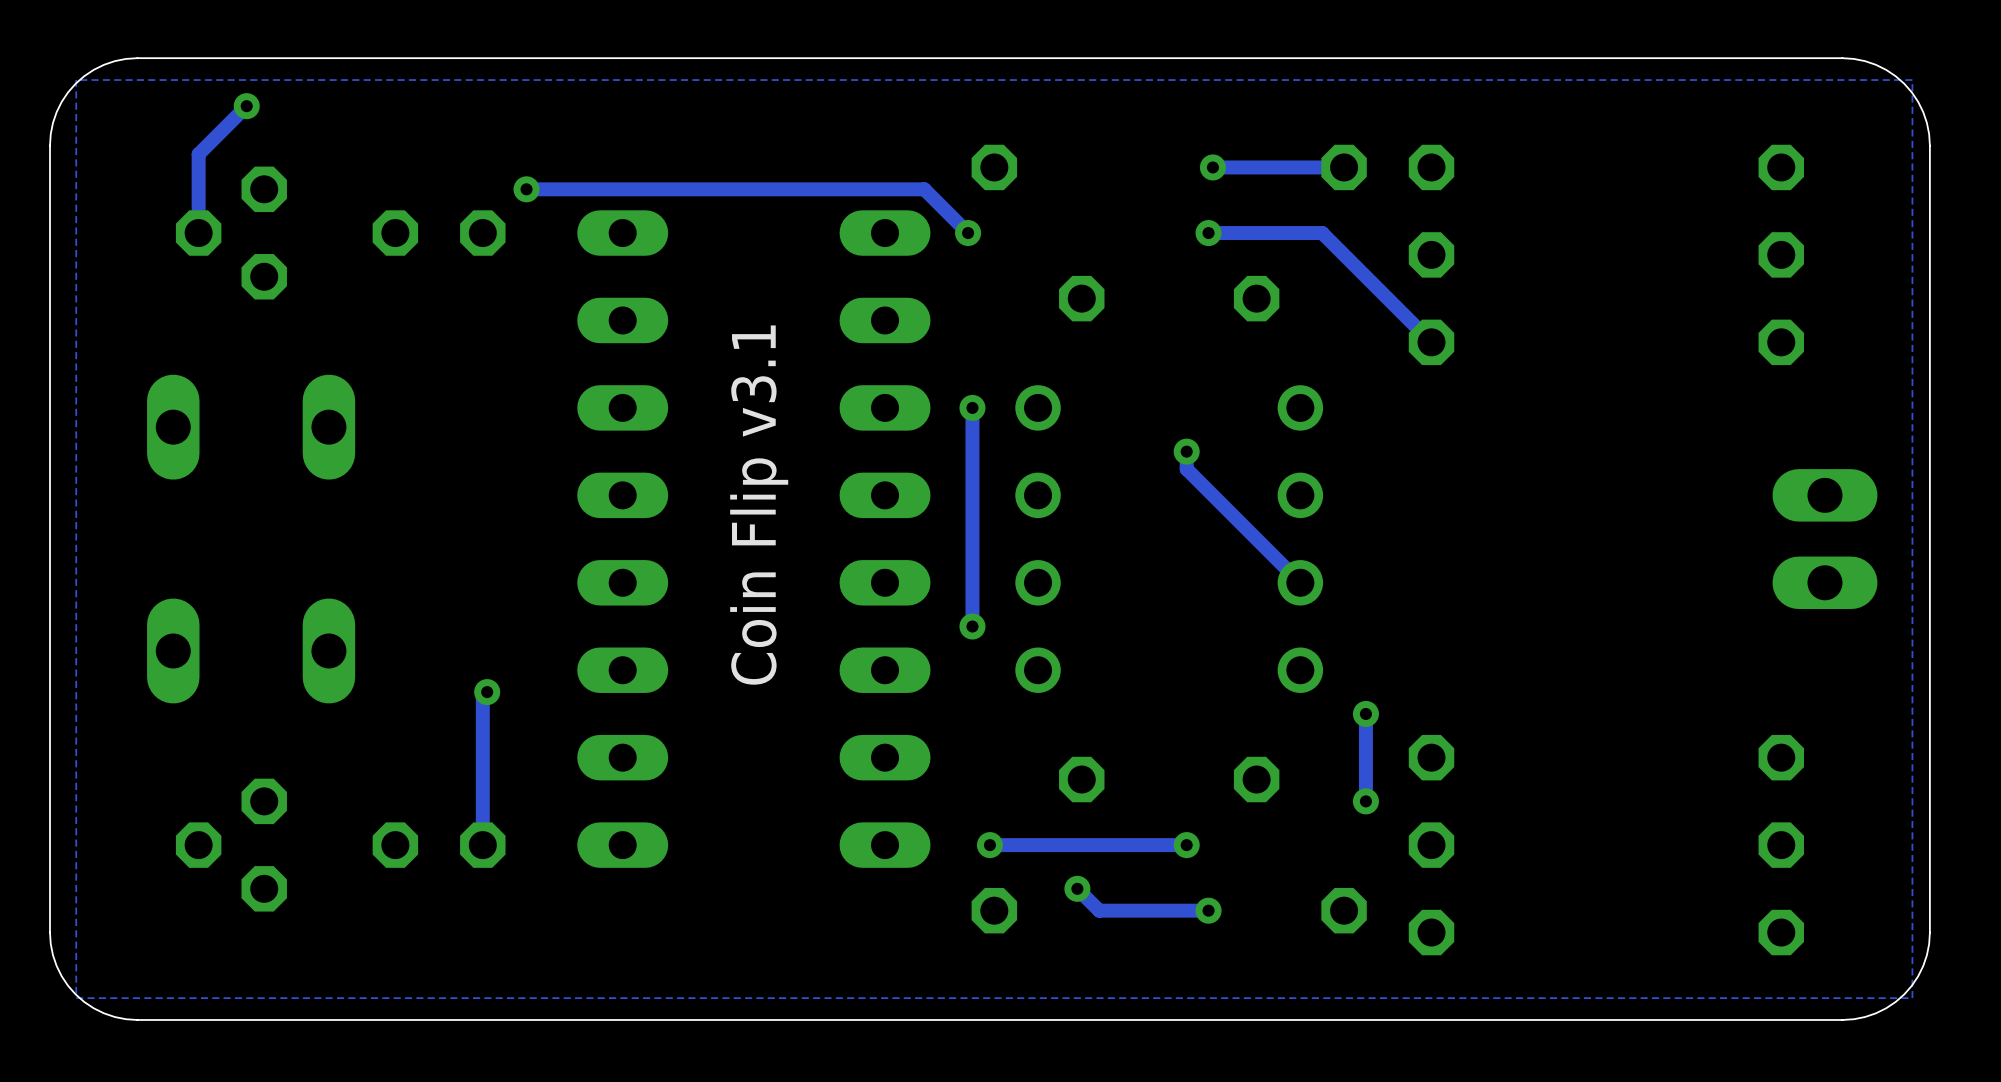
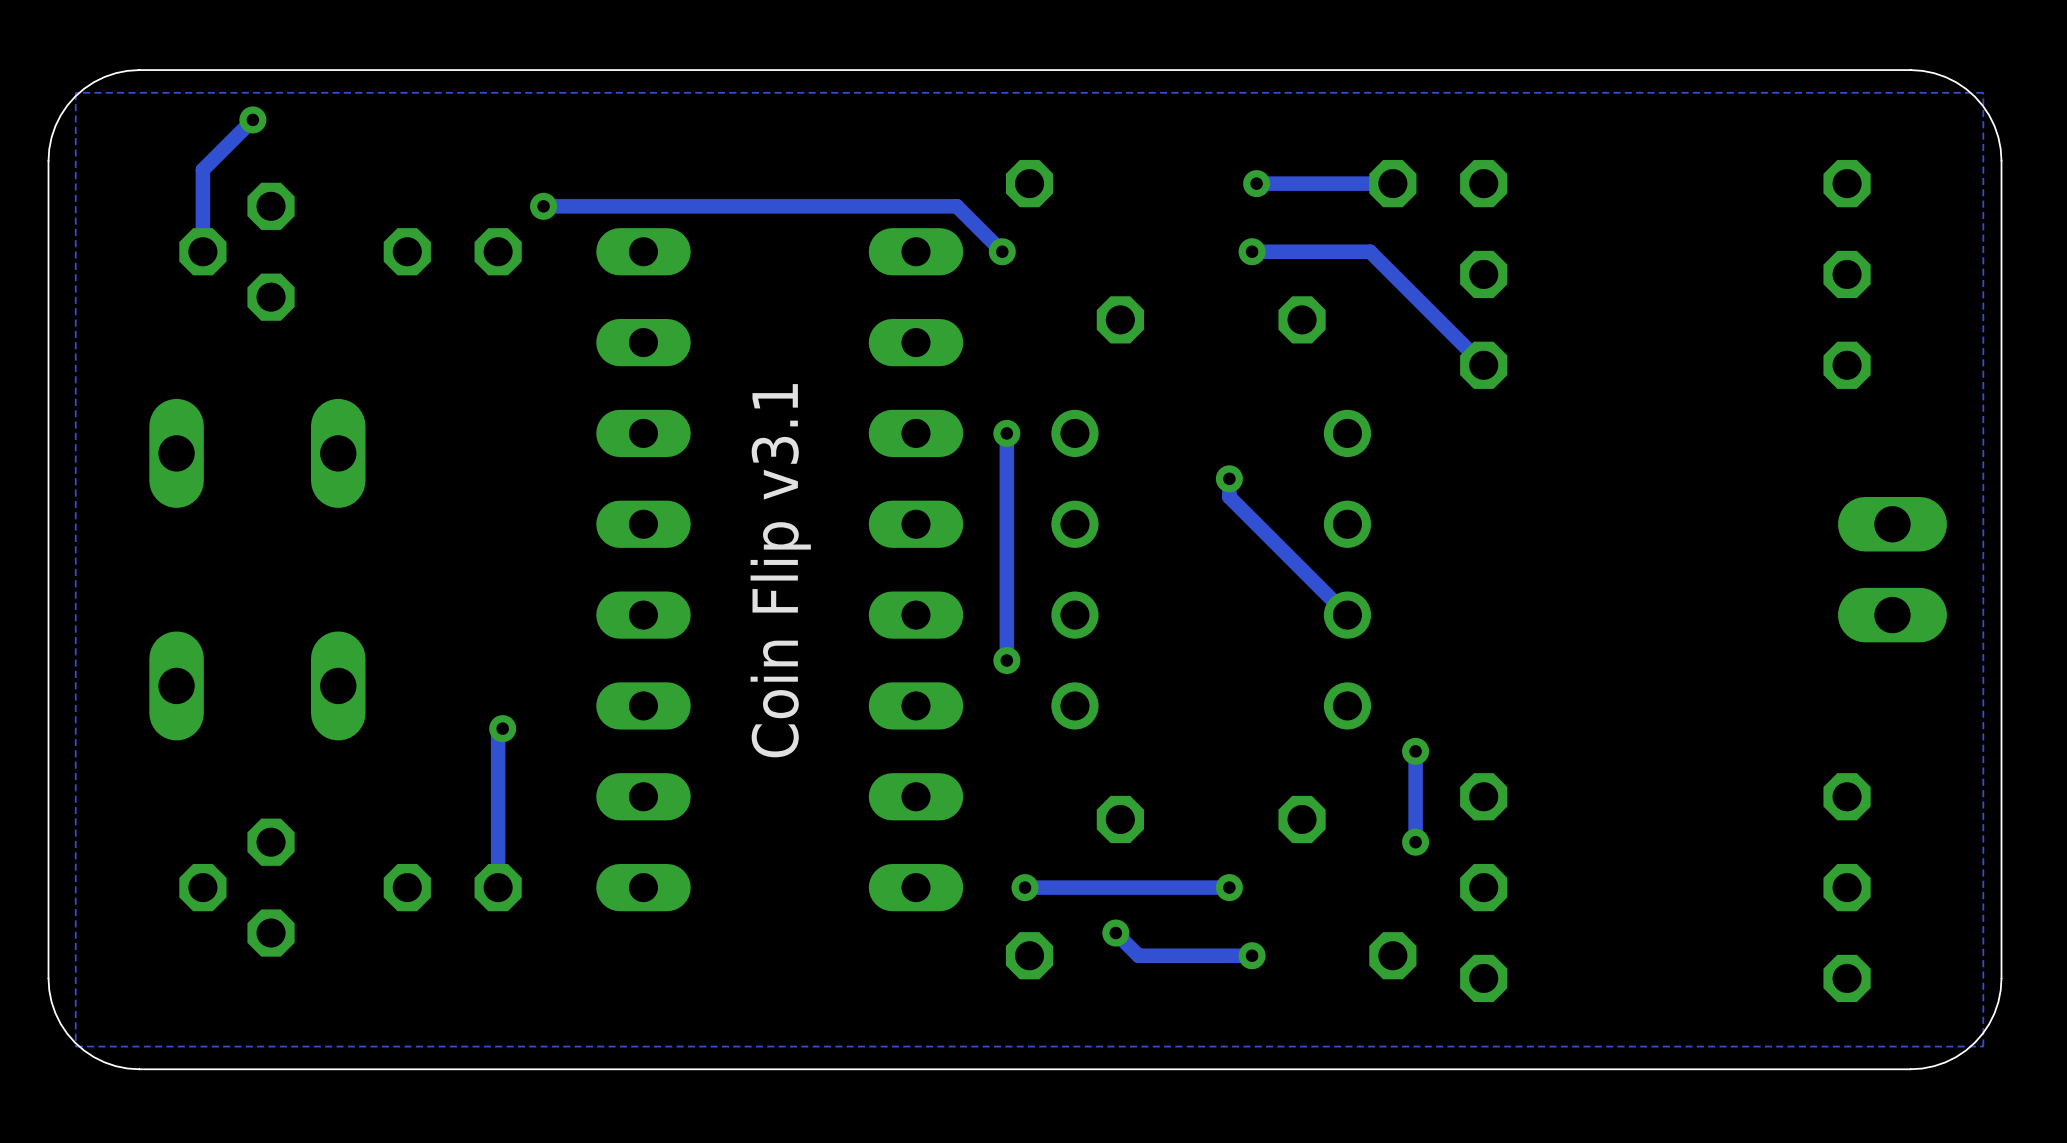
text position: Coin Flip v3.1 (759, 505) -> Coin Flip v3.1 (780, 570)

